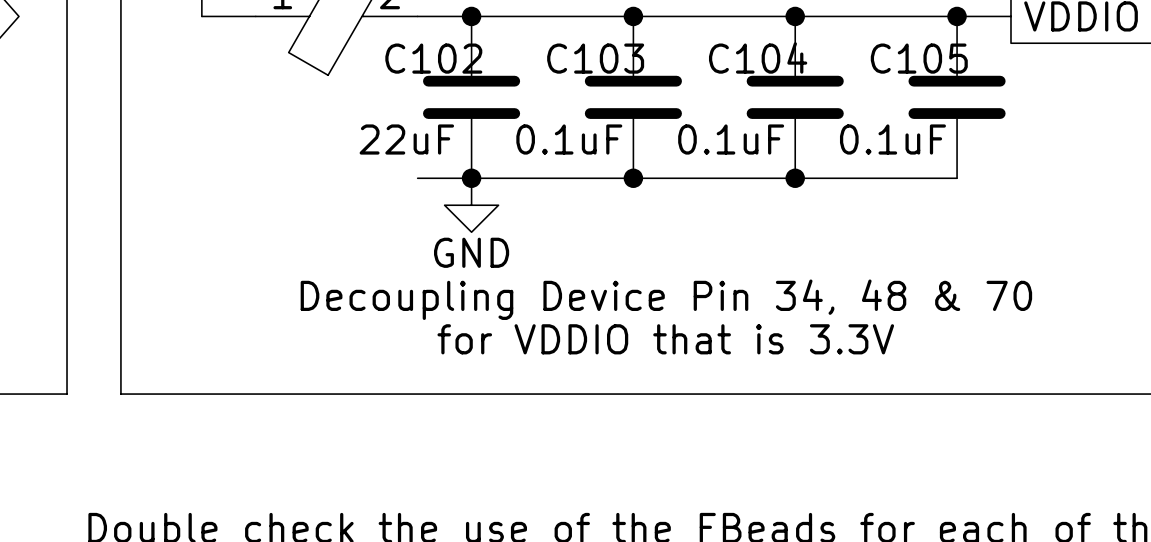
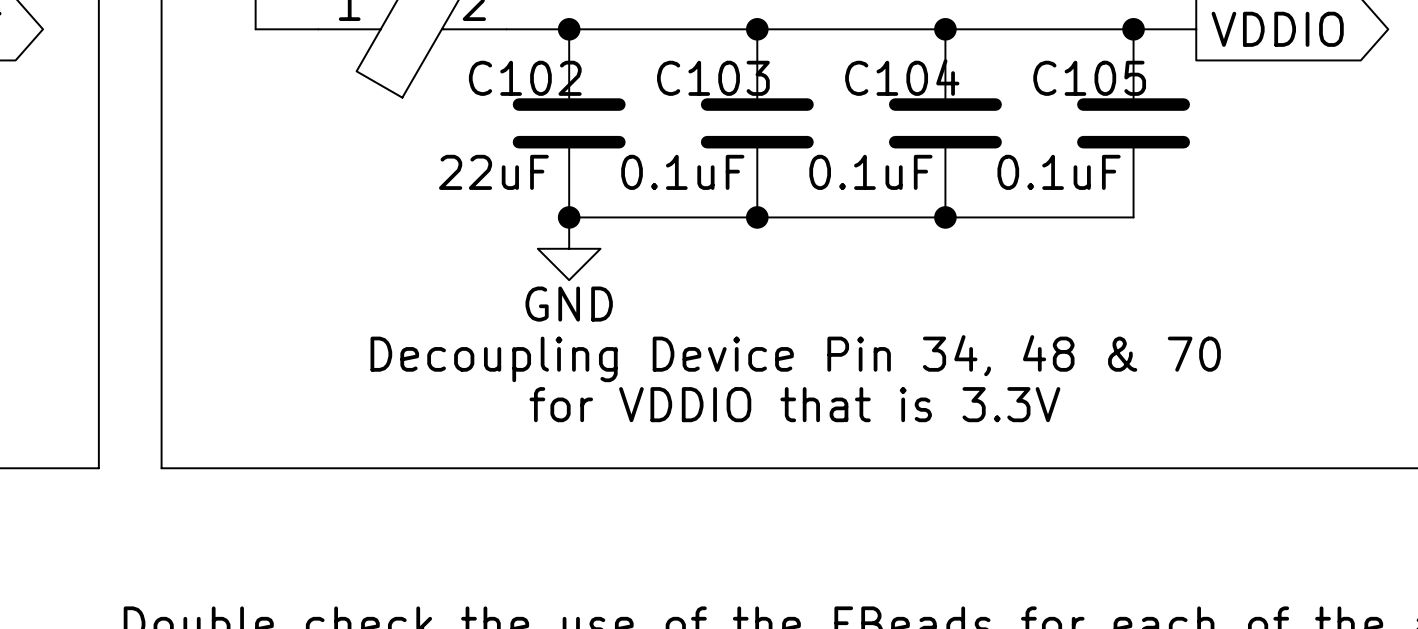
wire: (417, 178) (471, 178) -> none

